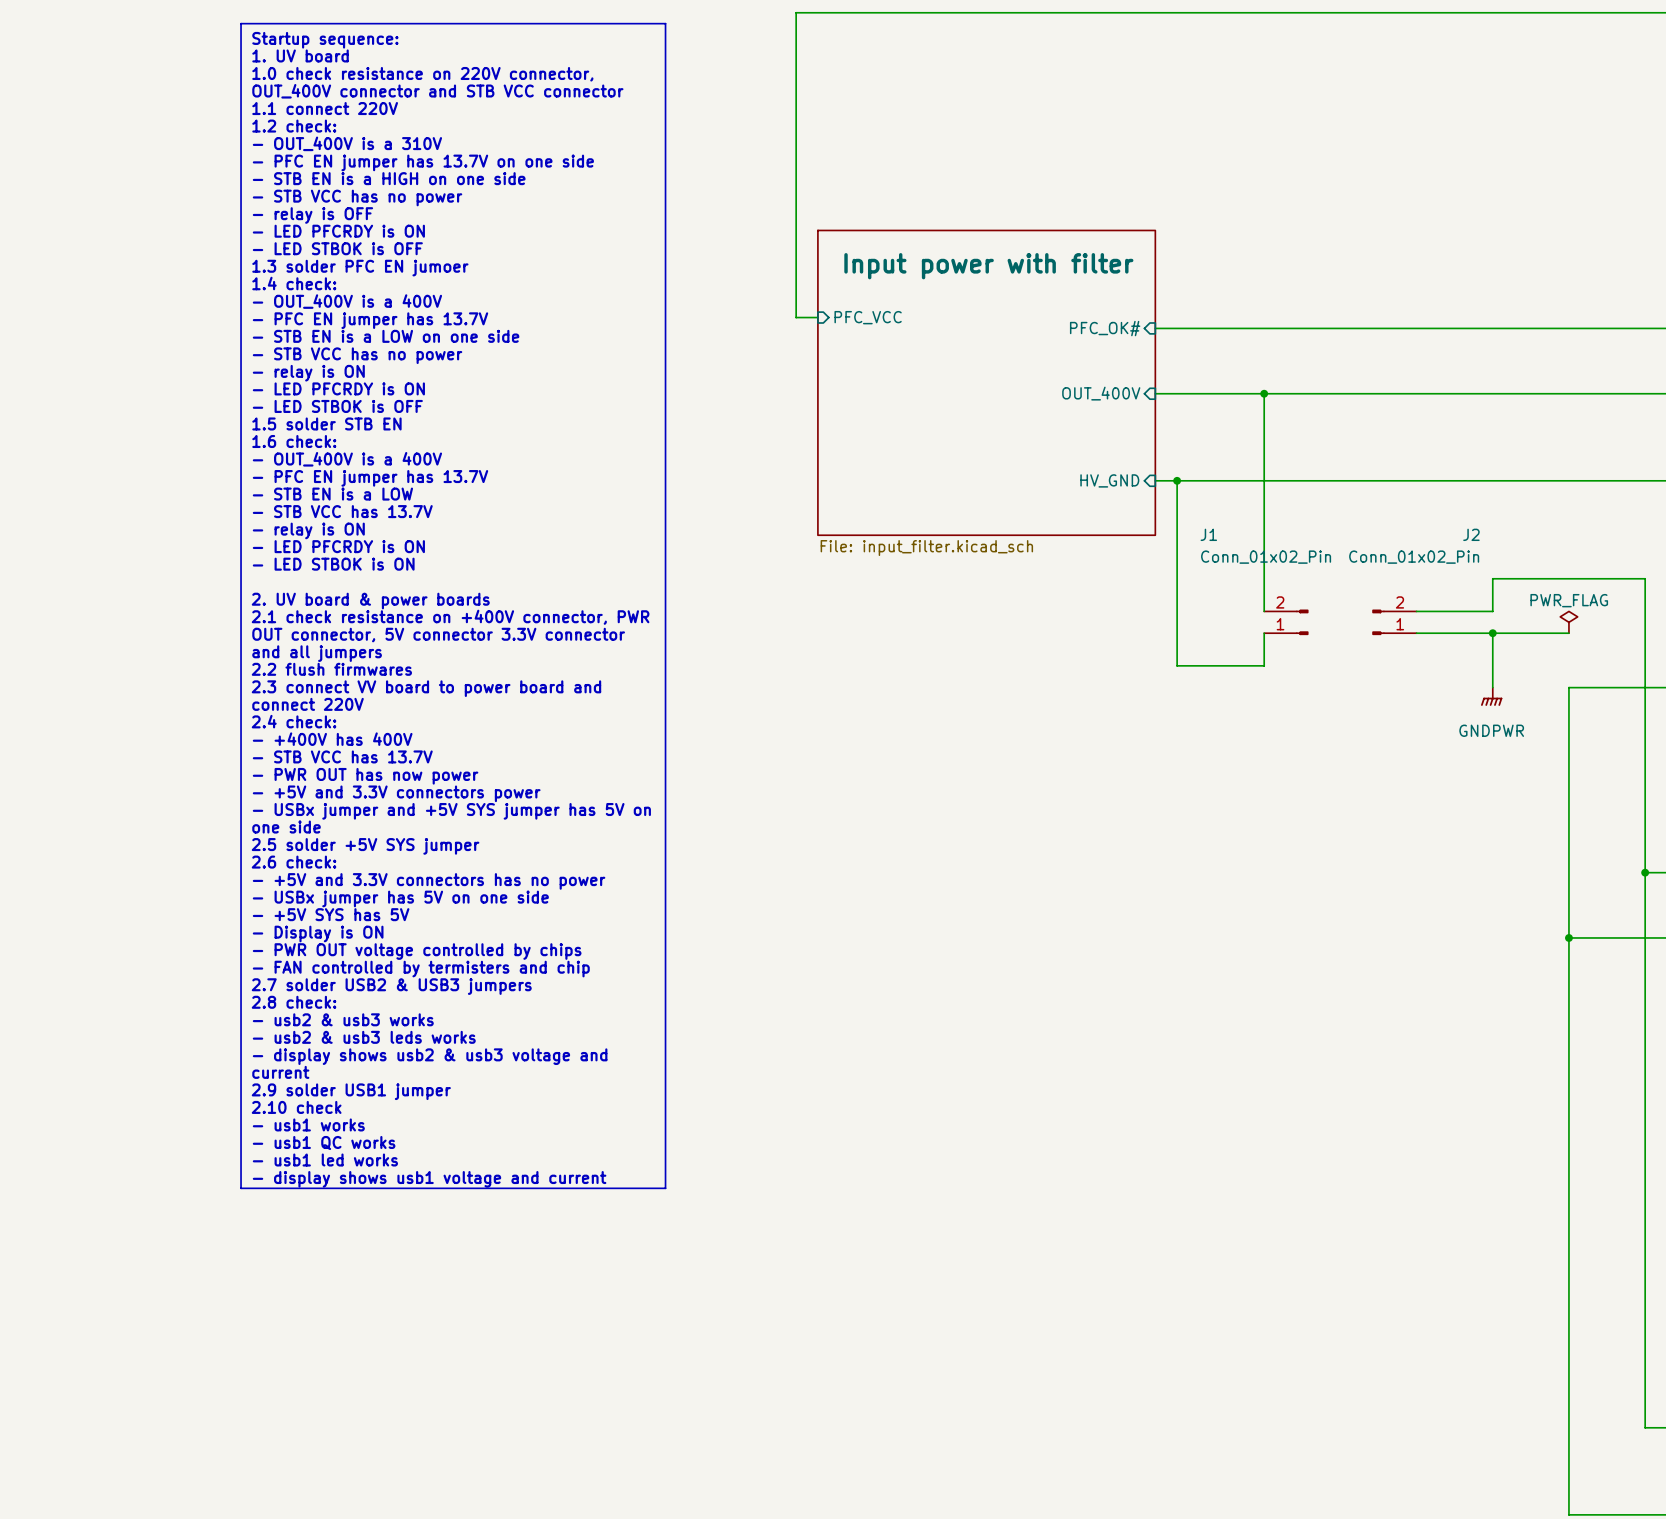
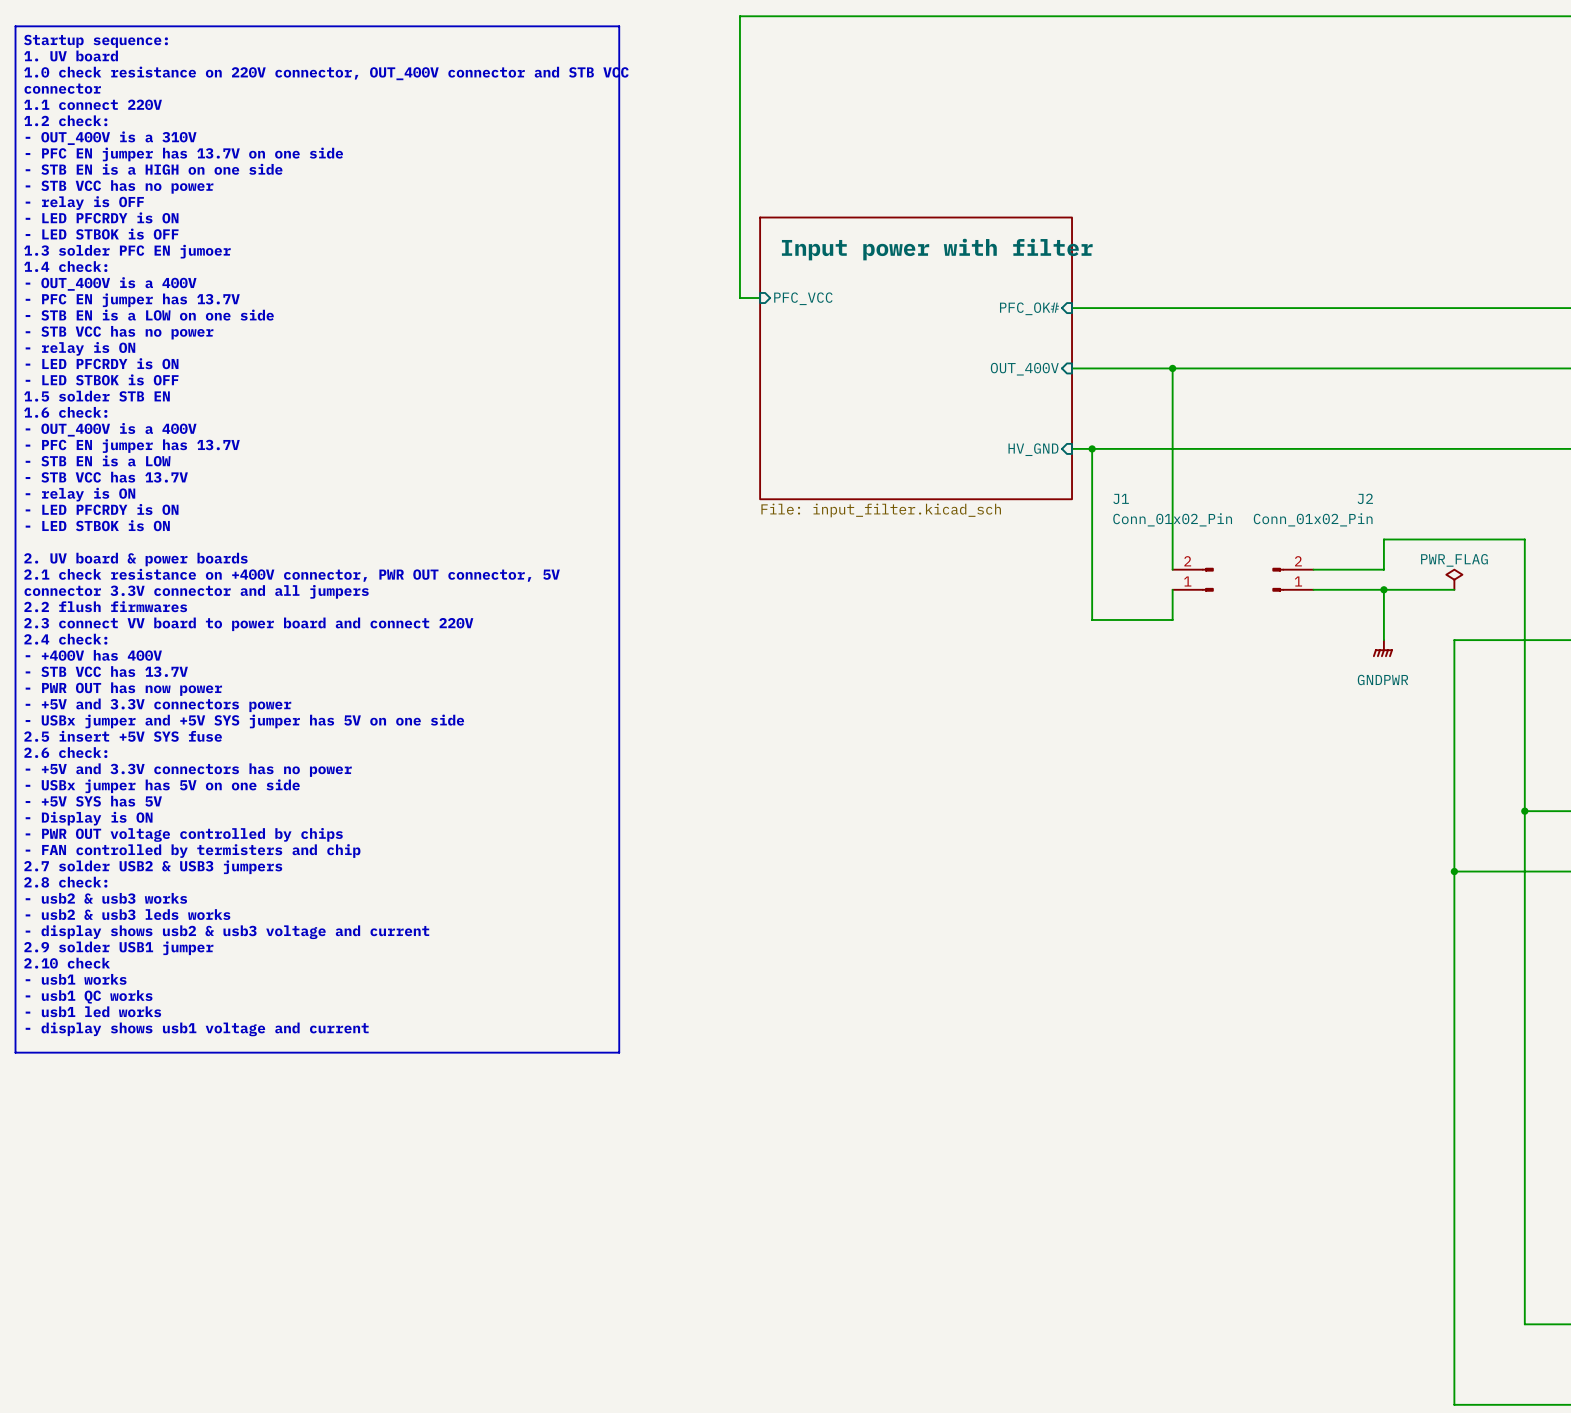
line: (241, 23) (241, 1188) (665, 1188) (665, 1133) -> (226, 26) (15, 26) (15, 1052) (619, 1052)
text: none -> Startup sequence: (96, 41)
text: Startup sequence: (325, 40) -> none
text: none -> 1. UV board (71, 55)
text: 1. UV board (300, 55) -> none
text: none -> 1.0 check resistance on 220V connector, OUT_400V connector and STB VCC (326, 73)
text: 1.0 check resistance on 220V connector, (422, 74) -> none
text: none -> connector (62, 88)
text: OUT_400V connector and STB VCC connector (437, 91) -> none
text: none -> 1.1 connect 220V (93, 104)
text: 1.1 connect 220V (325, 108) -> none
text: none -> 1.2 check: (65, 120)
text: 1.2 check: (294, 126) -> none
text: none -> - OUT_400V is a 310V (111, 138)
text: - OUT_400V is a 310V (347, 143) -> none
text: none -> - PFC EN jumper has 13.7V on one side (184, 154)
text: - PFC EN jumper has 13.7V on one side (423, 162) -> none
text: none -> - STB EN is a HIGH on one side (154, 169)
text: - STB EN is a HIGH on one side (389, 178) -> none
text: none -> - STB VCC has no power (119, 186)
text: - STB VCC has no power (357, 197) -> none
text: none -> - relay is OFF (84, 203)
text: - relay is OFF (312, 215) -> none
text: none -> - LED PFCRDY is ON (102, 217)
text: - LED PFCRDY is ON (338, 231) -> none
text: none -> - LED STBOK is OFF (102, 234)
text: - LED STBOK is OFF (337, 248) -> none
text: none -> 1.3 solder PFC EN jumoer (127, 251)
text: 1.3 solder PFC EN jumoer (360, 268) -> none
text: none -> 1.4 check: (65, 266)
text: 1.4 check: (294, 283) -> none
text: none -> - OUT_400V is a 400V (111, 283)
text: - OUT_400V is a 400V (347, 301) -> none
text: none -> - PFC EN jumper has 13.7V (132, 300)
text: - PFC EN jumper has 13.7V (370, 320) -> none
text: none -> - STB EN is a LOW on one side (149, 315)
text: - STB EN is a LOW on one side (386, 336) -> none
text: none -> - STB VCC has no power (119, 332)
text: - STB VCC has no power (357, 355) -> none
text: none -> - relay is ON (80, 348)
text: - relay is ON (308, 373) -> none
text: none -> - LED PFCRDY is ON (102, 363)
text: - LED PFCRDY is ON (338, 388) -> none
text: none -> - LED STBOK is OFF (102, 379)
text: - LED STBOK is OFF (337, 406) -> none
text: none -> 1.5 solder STB EN (96, 396)
text: 1.5 solder STB EN (326, 423) -> none
text: none -> 1.6 check: (65, 412)
text: 1.6 check: (294, 441) -> none
text: none -> - OUT_400V is a 400V (111, 429)
text: - OUT_400V is a 400V (347, 459) -> none
text: none -> - PFC EN jumper has 13.7V (132, 446)
text: - PFC EN jumper has 13.7V (370, 478) -> none
text: none -> - STB EN is a LOW (98, 460)
text: - STB EN is a LOW (332, 494) -> none
text: none -> - STB VCC has 13.7V (106, 477)
text: - STB VCC has 13.7V (342, 511) -> none
text: none -> - relay is ON (80, 494)
text: - relay is ON (308, 530) -> none
text: none -> - LED PFCRDY is ON (102, 509)
text: - LED PFCRDY is ON (338, 546) -> none
text: none -> - LED STBOK is ON (97, 525)
text: - LED STBOK is ON (333, 564) -> none
text: none -> 2. UV board & power boards (135, 559)
text: 2. UV board & power boards (370, 601) -> none
text: none -> 2.1 check resistance on +400V connector, PWR OUT connector, 5V (292, 575)
text: 2.1 check resistance on +400V connector, PWR (450, 617) -> none
text: OUT connector, 5V connector 3.3V connector (438, 635) -> none
text: none -> connector 3.3V connector and all jumpers (196, 591)
text: none -> 2.2 flush firmwares (105, 606)
text: and all jumpers (317, 653) -> none
text: 2.2 flush firmwares (331, 669) -> none
text: none -> 2.3 connect VV board to power board and connect 220V (248, 624)
text: none -> 2.4 check: (65, 639)
text: 2.3 connect VV board to power board and (426, 688) -> none
text: none -> - +400V has 400V (93, 655)
text: connect 220V (308, 704) -> none
text: none -> - STB VCC has 13.7V (106, 671)
text: 2.4 check: (294, 721) -> none
text: - +400V has 400V (332, 739) -> none
text: none -> - PWR OUT has now power (123, 689)
text: - STB VCC has 13.7V (342, 756) -> none
text: none -> - +5V and 3.3V connectors power (158, 705)
text: none -> - USBx jumper and +5V SYS jumper has 5V on one side (244, 721)
text: - PWR OUT has now power (365, 776) -> none
text: none -> 2.5 insert +5V SYS fuse (123, 736)
text: - +5V and 3.3V connectors power (396, 793) -> none
text: none -> 2.6 check: (65, 752)
text: - USBx jumper and +5V SYS jumper has 5V on (451, 811) -> none
text: one side (286, 827) -> none
text: none -> - +5V and 3.3V connectors has no power (188, 770)
text: none -> - USBx jumper has 5V on one side (162, 786)
text: 2.5 solder +5V SYS jumper (365, 846) -> none
text: none -> - +5V SYS has 5V (93, 801)
text: 2.6 check: (294, 862) -> none
text: none -> - Display is ON (89, 818)
text: - +5V and 3.3V connectors has no power (429, 881) -> none
text: none -> - PWR OUT voltage controlled by chips (184, 834)
text: - USBx jumper has 5V on one side (400, 898) -> none
text: - +5V SYS has 5V (331, 914) -> none
text: none -> - FAN controlled by termisters and chip (193, 851)
text: none -> 2.7 solder USB2 & USB3 jumpers (153, 867)
text: - Display is ON (318, 934) -> none
text: none -> 2.8 check: (65, 882)
text: - PWR OUT voltage controlled by chips (417, 951) -> none
text: none -> - usb2 & usb3 works (106, 898)
text: - FAN controlled by termisters and chip (421, 969) -> none
text: none -> - usb2 & usb3 leds works (127, 914)
text: 2.7 solder USB2 & USB3 jumpers (391, 986) -> none
text: 2.8 check: (294, 1002) -> none
text: none -> - display shows usb2 & usb3 voltage and current (227, 932)
text: - usb2 & usb3 works (343, 1019) -> none
text: none -> 2.9 solder USB1 jumper (118, 948)
text: none -> 2.10 check (67, 963)
text: - usb2 & usb3 leds works (364, 1037) -> none
text: none -> - usb1 works (76, 979)
text: - display shows usb2 & usb3 voltage and (430, 1056) -> none
text: none -> - usb1 QC works (89, 996)
text: current (280, 1072) -> none
text: none -> - usb1 led works (93, 1011)
text: 2.9 solder USB1 jumper (351, 1091) -> none
text: 2.10 check (296, 1107) -> none
text: none -> - display shows usb1 voltage and current (197, 1029)
text: - usb1 works (308, 1124) -> none
text: - usb1 QC works (324, 1143) -> none
text: - usb1 led works (325, 1160) -> none
text: - display shows usb1 voltage and current (429, 1179) -> none

